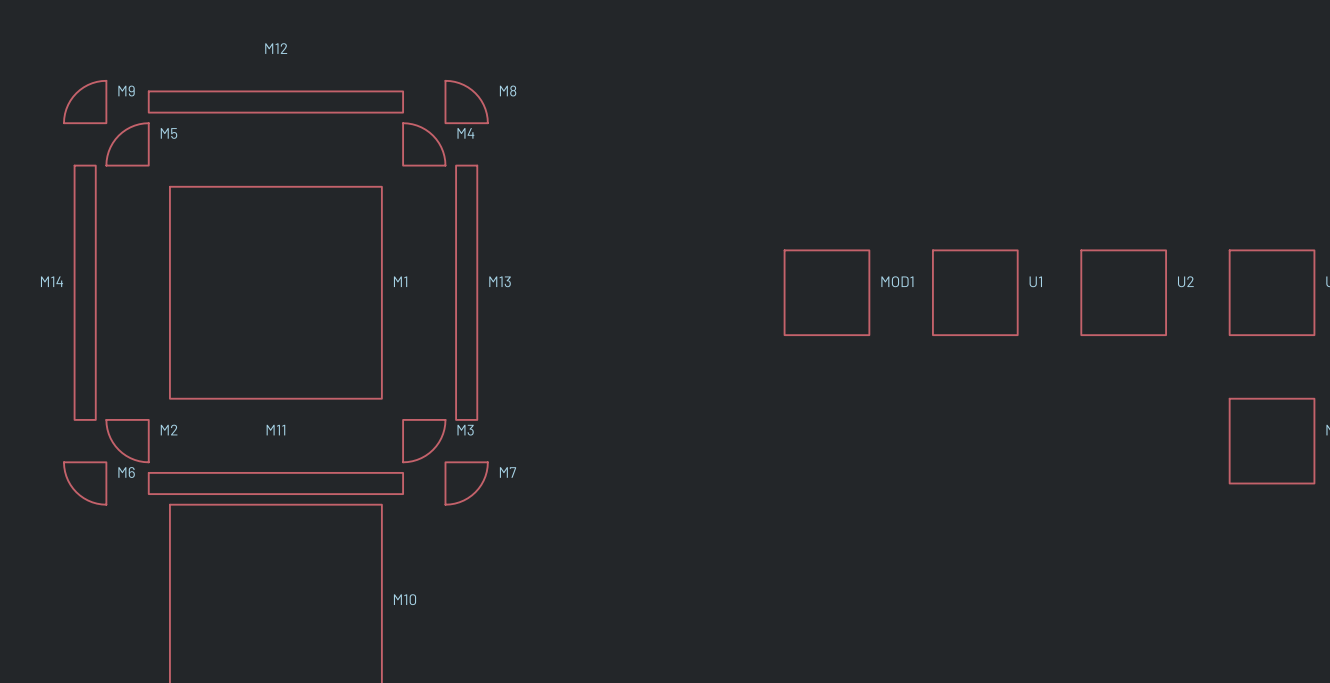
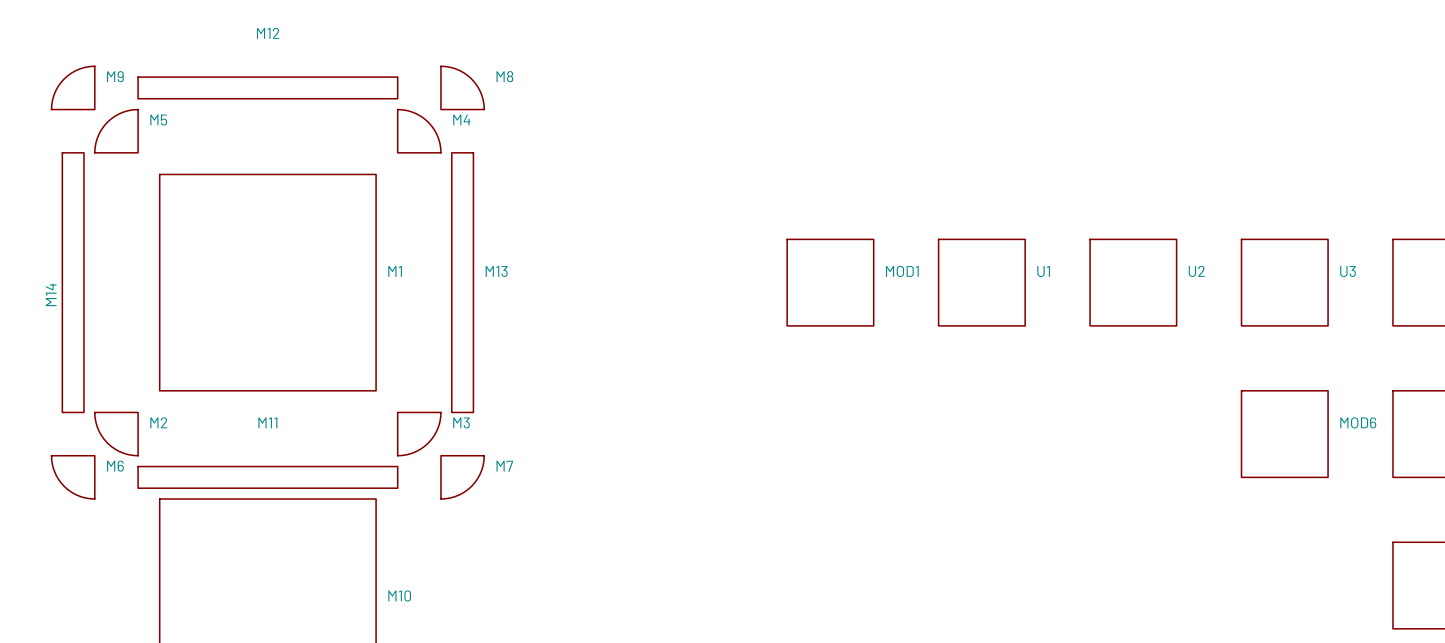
M14 name rotation: 0° (52, 281) -> 90° counterclockwise (51, 294)

